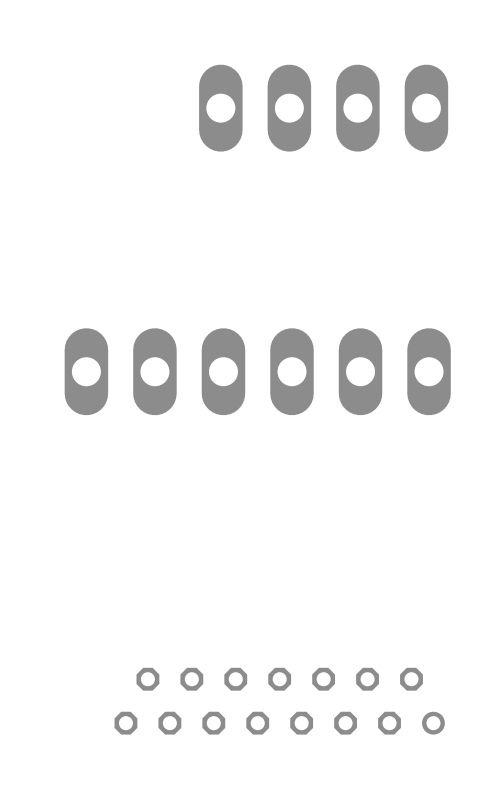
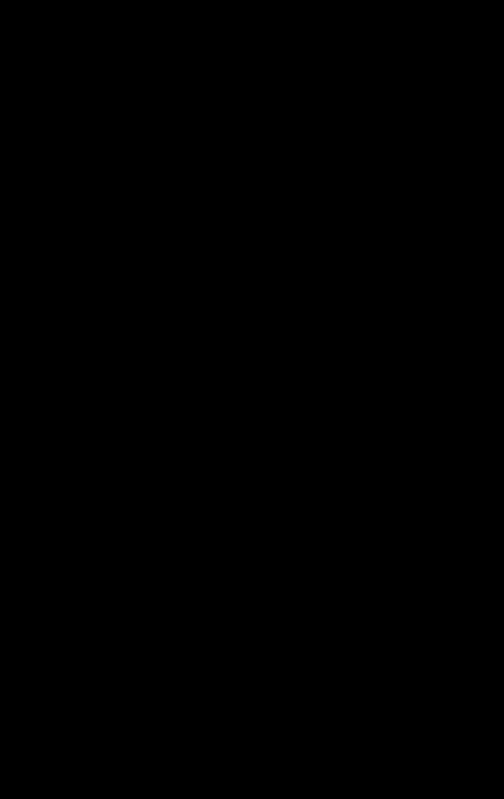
part: (323, 108) -> none
part: (257, 371) -> none
part: (279, 701) -> none

